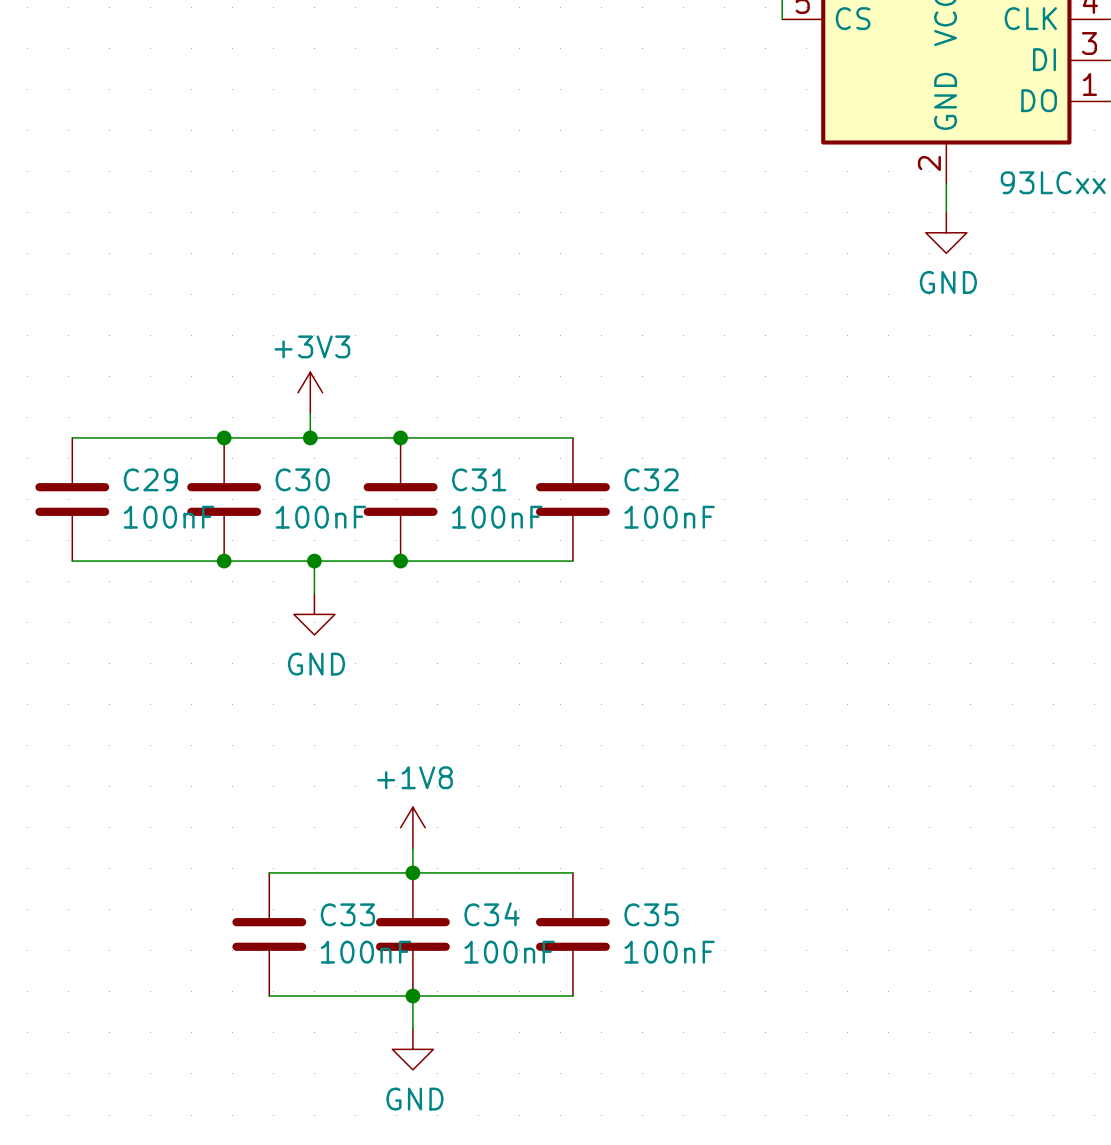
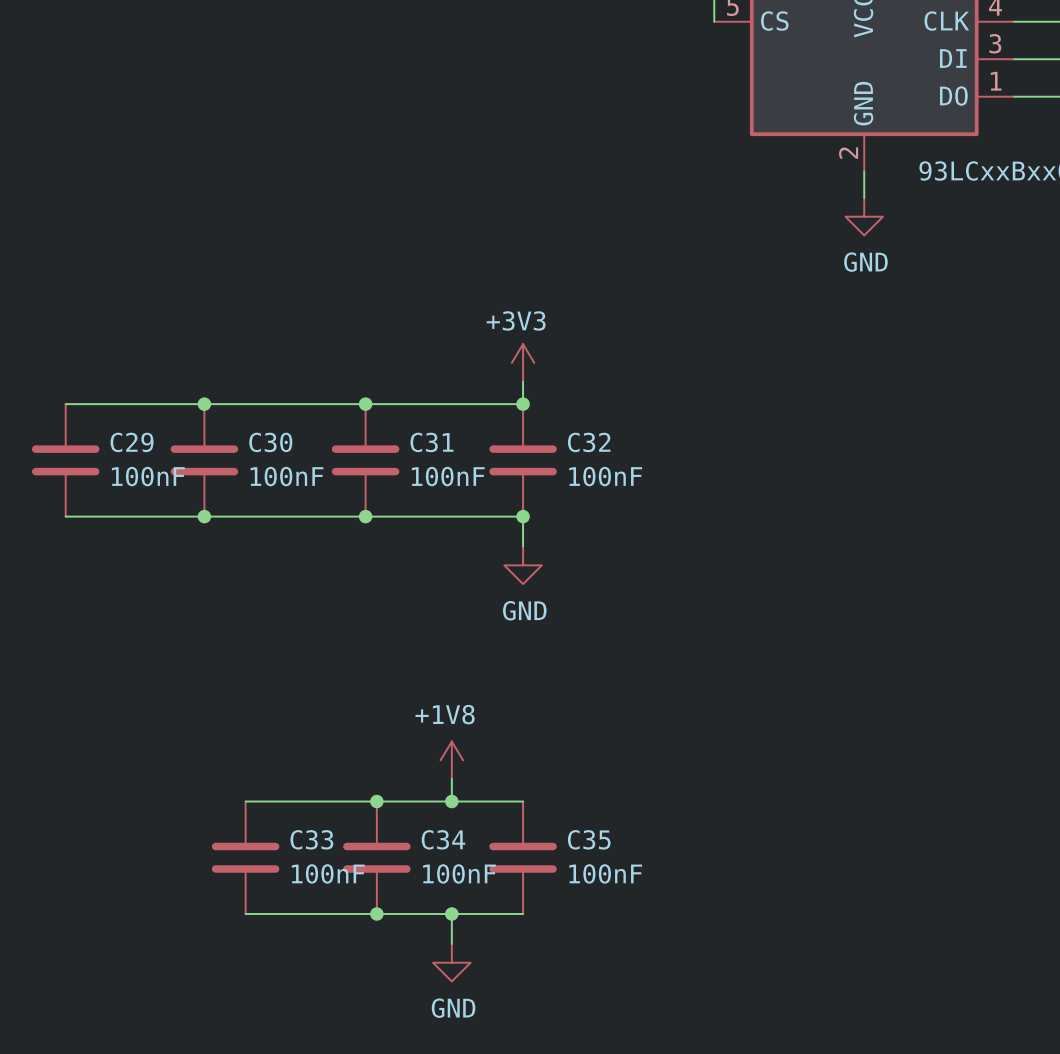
power symbol position: +3V3 (310, 392) -> +3V3 (523, 362)
wire: (310, 413) (310, 437) -> (523, 381) (523, 404)
junction: (310, 437) -> none
junction: none -> (523, 404)
wire: (314, 561) (314, 593) -> (523, 516) (523, 546)
junction: (314, 561) -> none
junction: none -> (523, 516)
power symbol: GND (314, 614) -> none
power symbol: none -> GND (523, 565)
power symbol position: +1V8 (412, 827) -> +1V8 (451, 760)
wire: (412, 848) (412, 872) -> (451, 779) (451, 801)
junction: none -> (451, 801)
wire: (412, 996) (412, 1028) -> (451, 914) (451, 943)
junction: none -> (451, 914)
power symbol position: GND (412, 1049) -> GND (451, 962)

